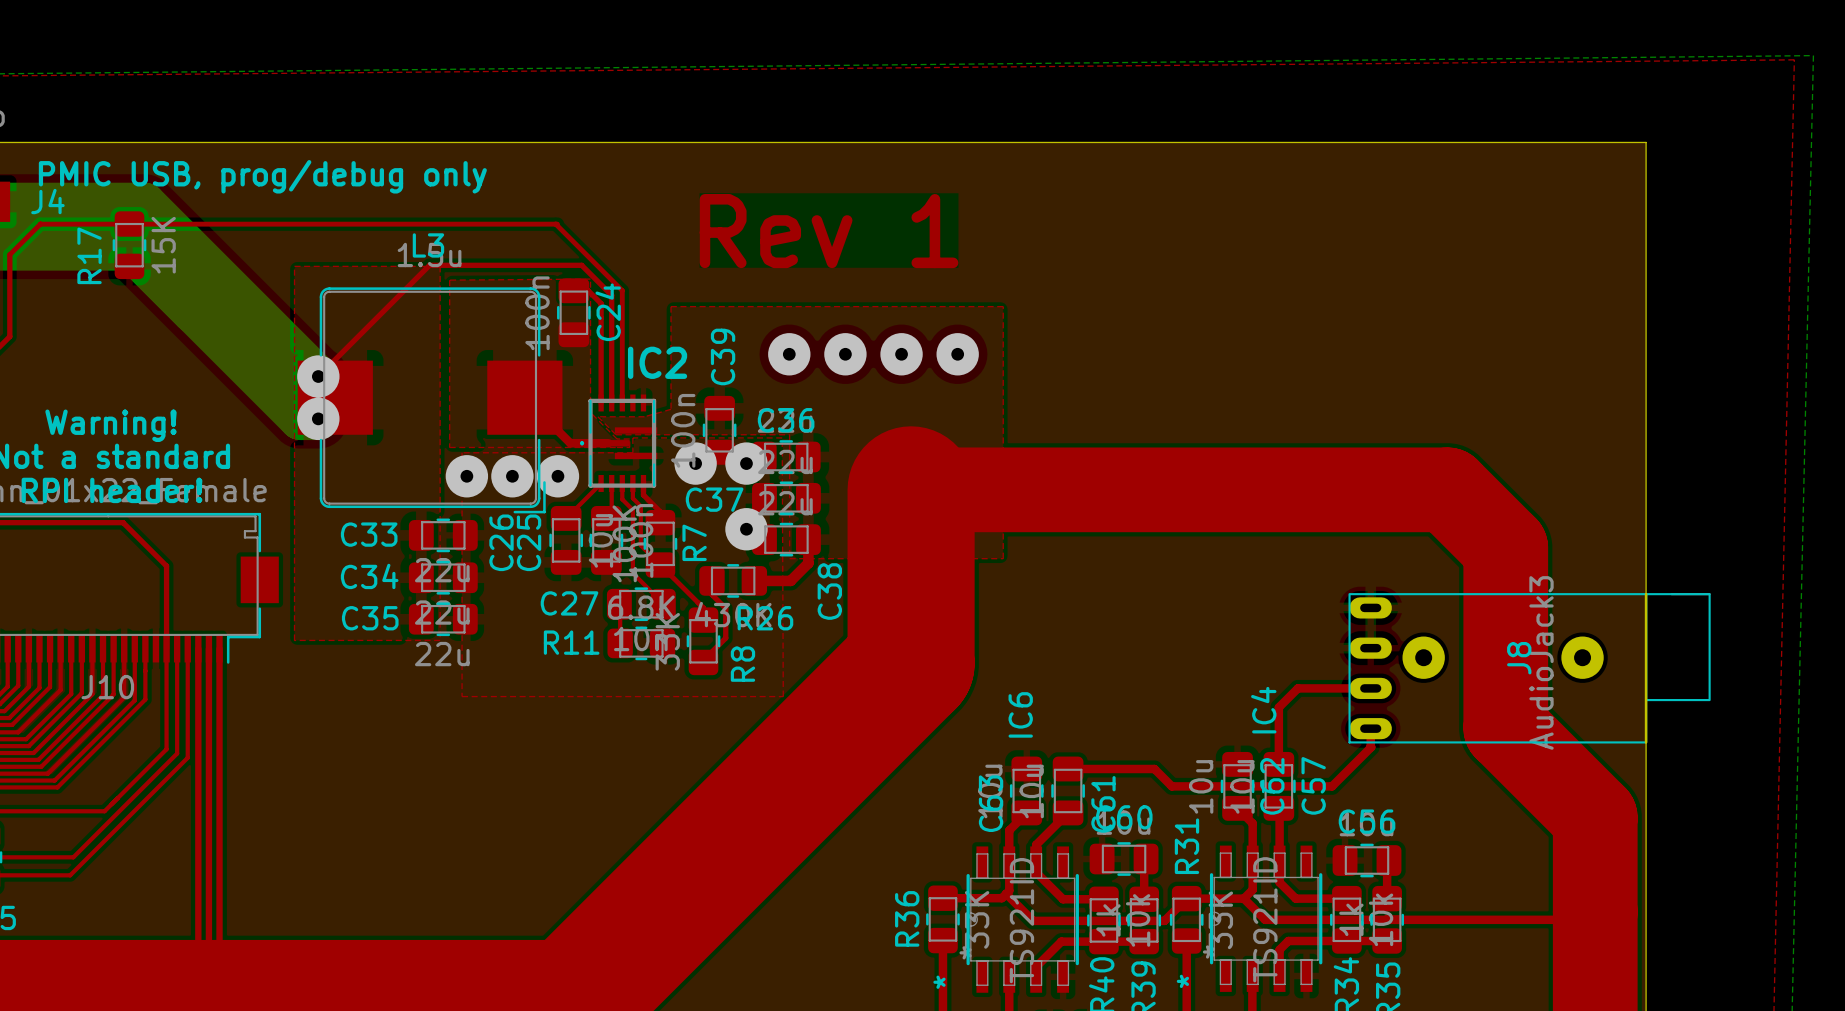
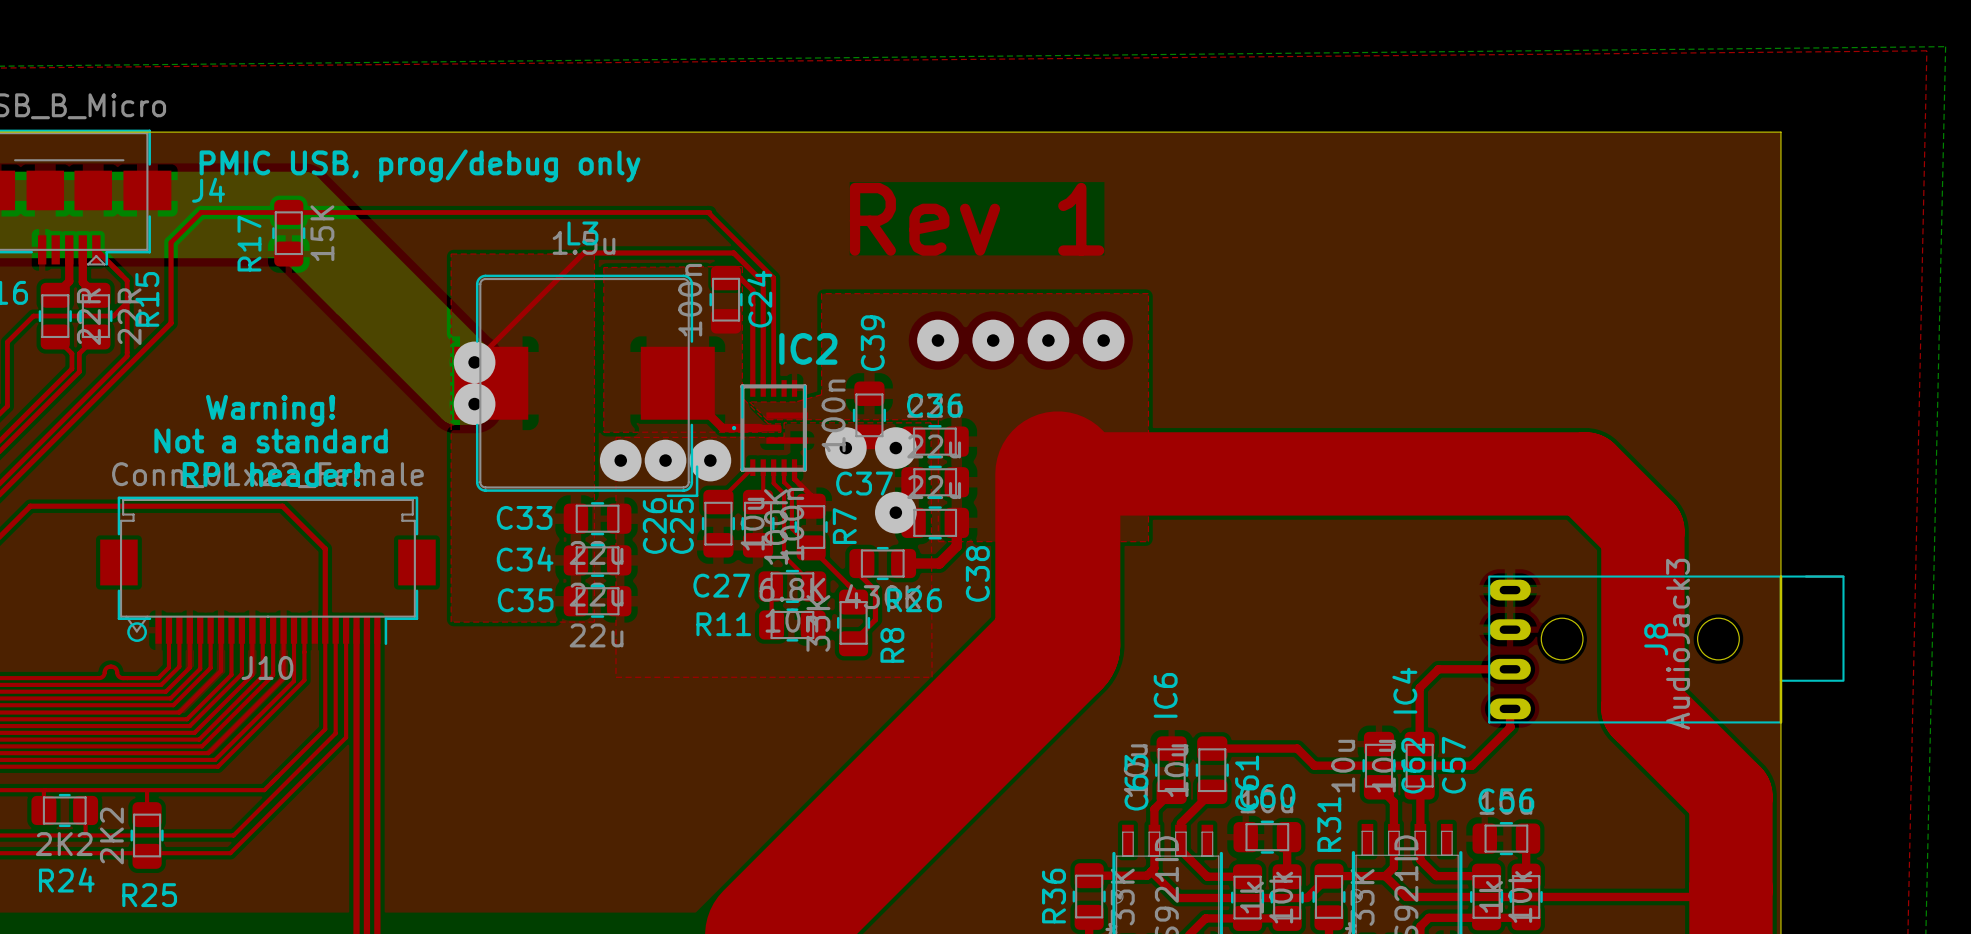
J8 footprint: [1348, 592, 1711, 744] -> [1488, 575, 1845, 724]

